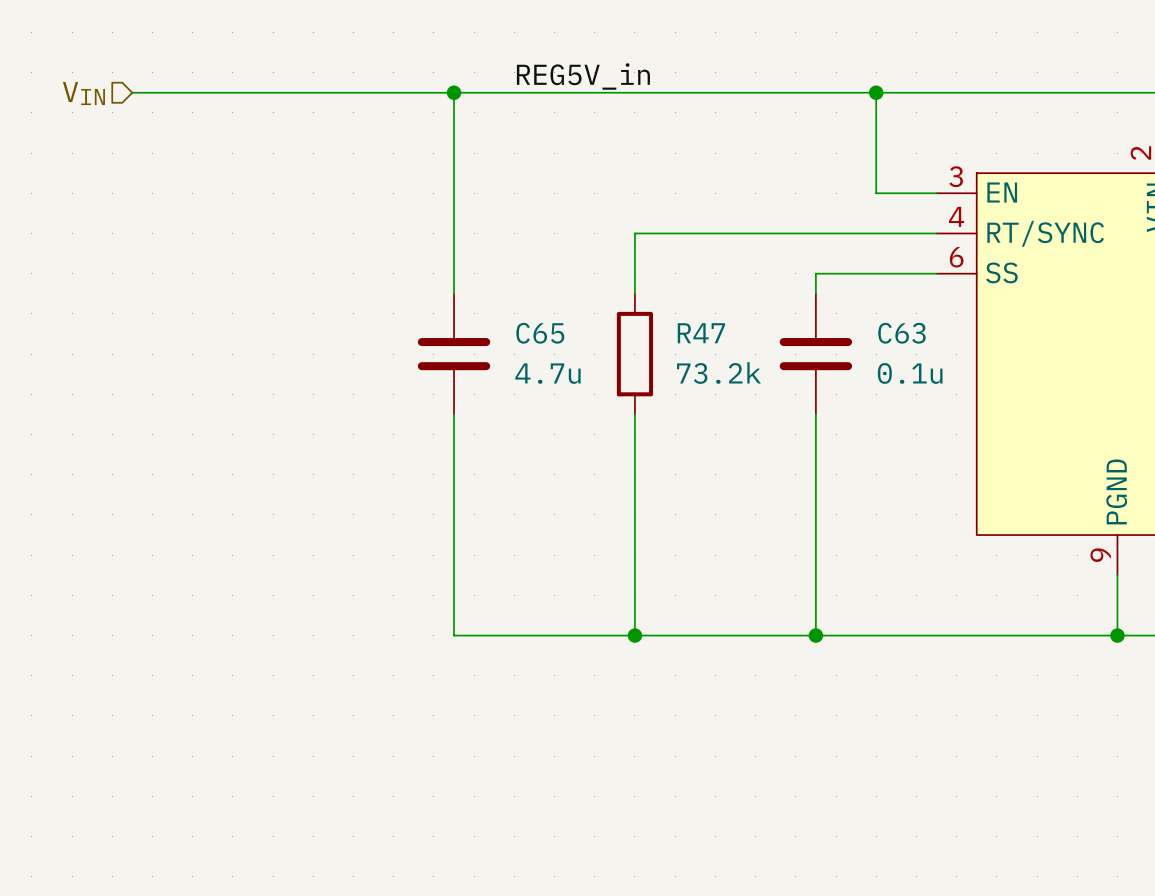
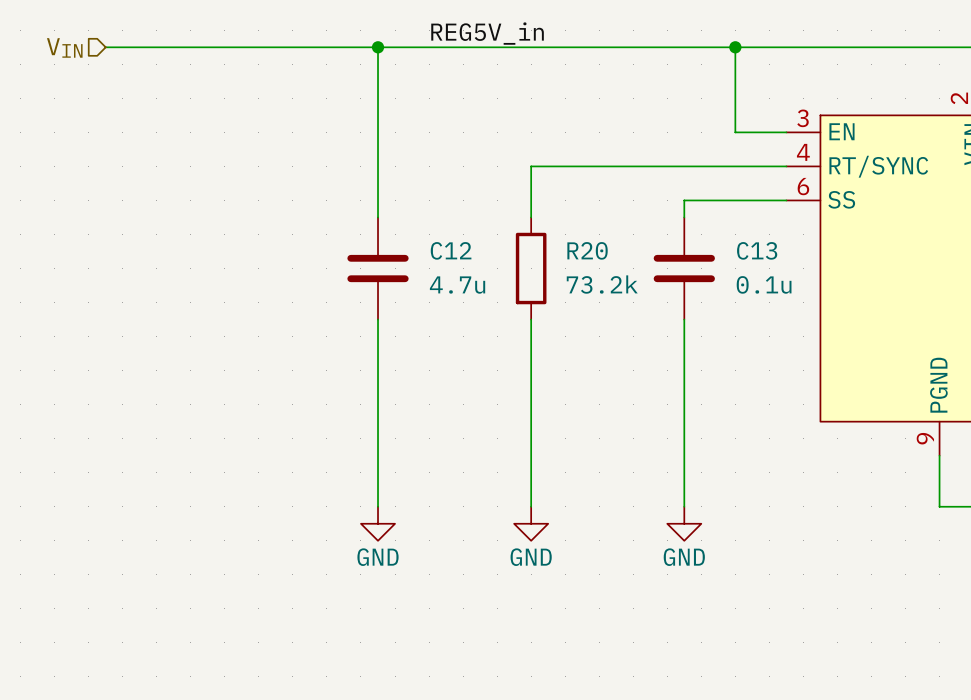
C65 name: C65 (540, 333) -> C12 (451, 250)
R47 name: R47 (701, 333) -> R20 (587, 250)
C63 name: C63 (901, 333) -> C13 (757, 250)
wire: (454, 635) (1117, 635) -> none
junction: (634, 635) -> none
junction: (815, 635) -> none
junction: (1117, 635) -> none
power symbol: none -> GND (378, 523)
power symbol: none -> GND (531, 523)
power symbol: none -> GND (684, 523)

